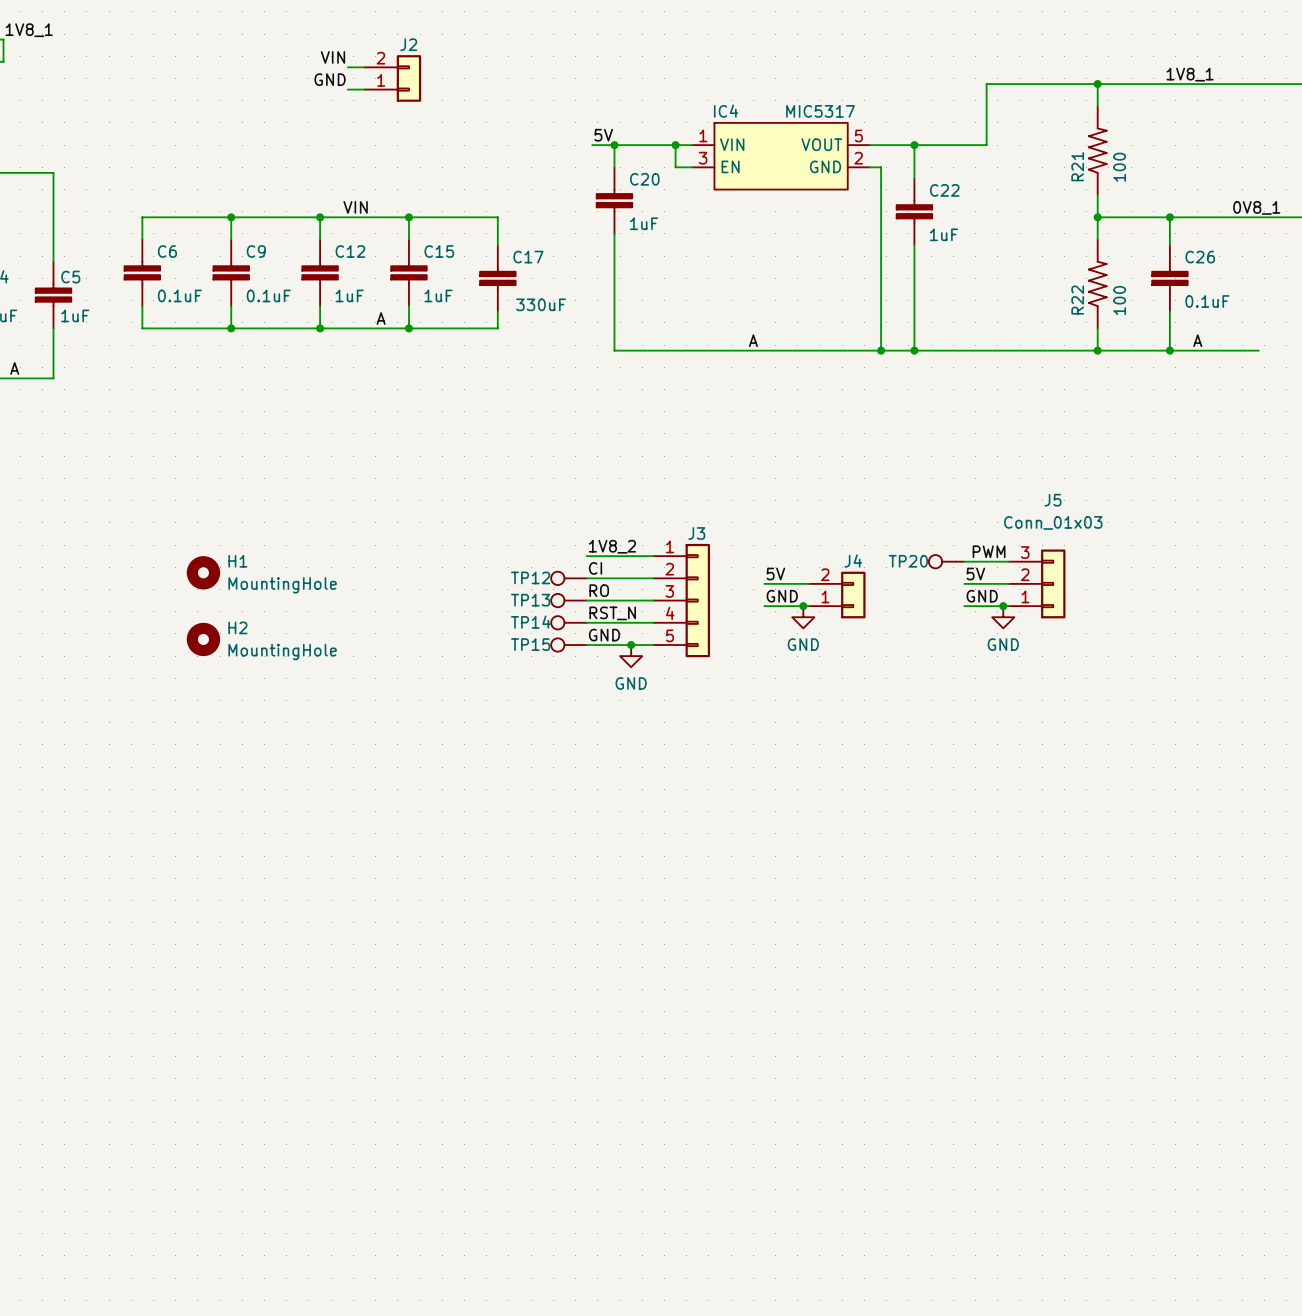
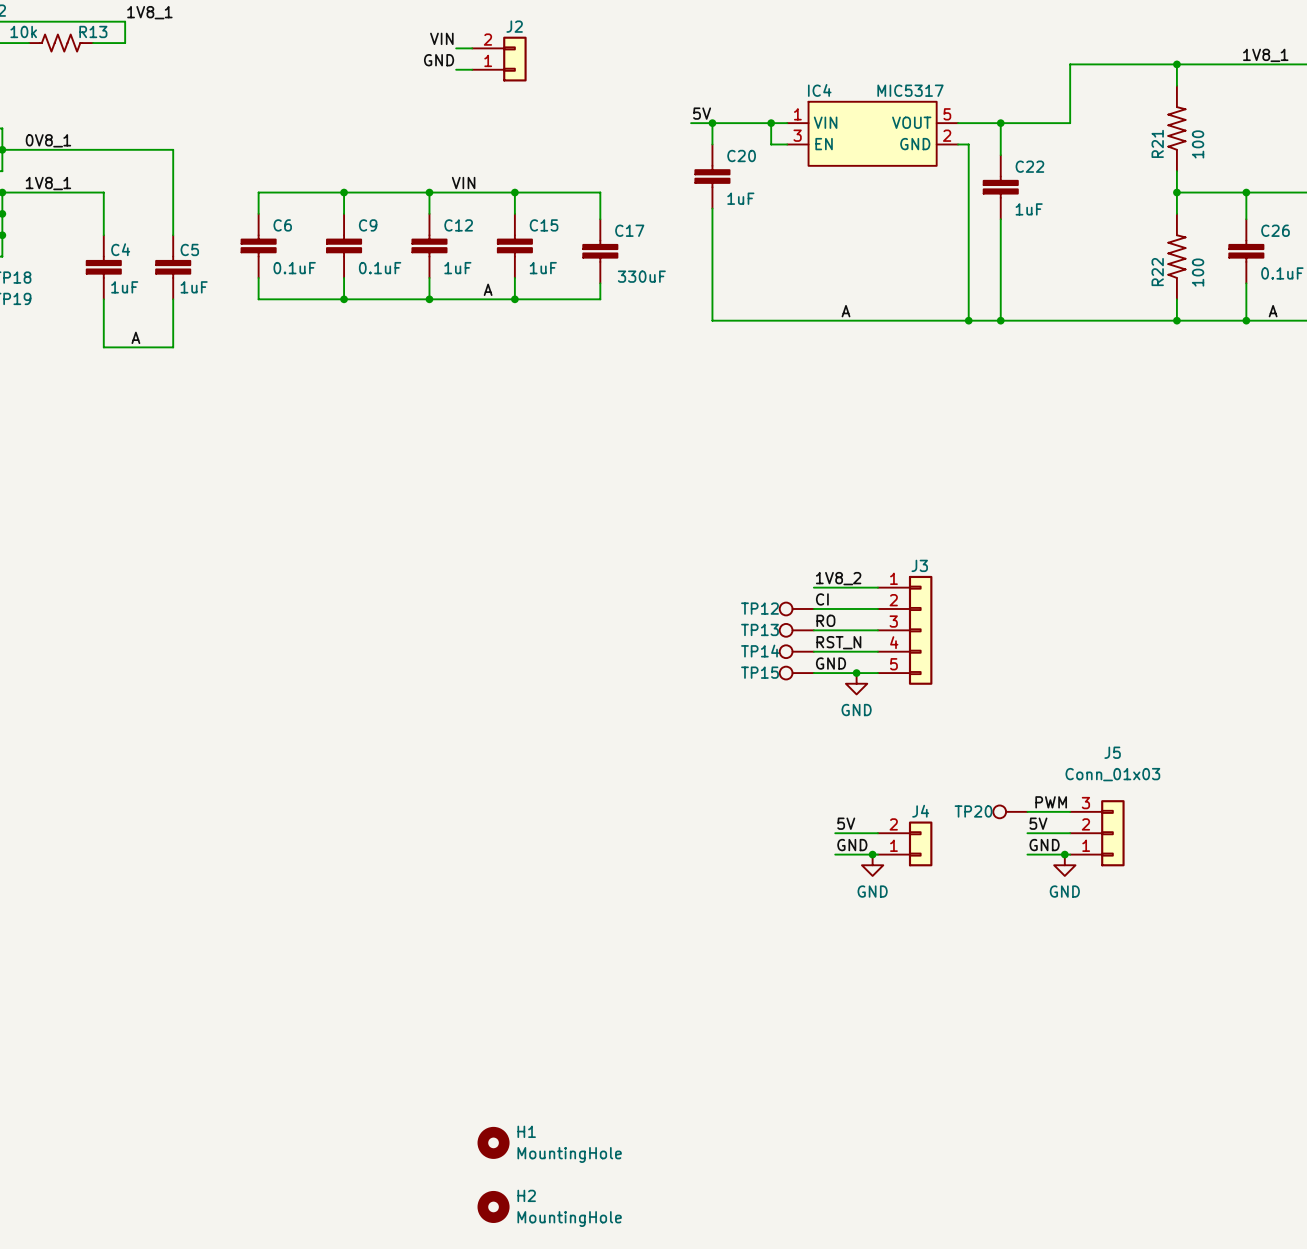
label position: 1V8_2 (612, 546) -> 1V8_2 (838, 578)
label: PWM (989, 551) -> none
wire: (586, 556) (653, 556) -> (813, 587) (877, 587)
TP20 position: (946, 561) -> (1010, 811)
wire: (964, 561) (1008, 561) -> none
label position: CI (595, 568) -> CI (822, 599)
H1 position: (203, 572) -> (493, 1142)
label: 5V (775, 573) -> none
label: 5V (975, 573) -> none
TP12 position: (568, 578) -> (796, 608)
wire: (586, 578) (653, 578) -> (813, 608) (877, 608)
wire: (764, 583) (808, 583) -> none
wire: (964, 583) (1008, 583) -> none
J5 position: (1037, 583) -> (1097, 833)
label position: RO (599, 590) -> RO (825, 620)
J4 position: (837, 595) -> (905, 843)
label: GND (782, 596) -> none
label: GND (982, 596) -> none
TP13 position: (568, 600) -> (796, 630)
wire: (586, 600) (653, 600) -> (813, 630) (877, 630)
J3 position: (681, 600) -> (905, 630)
wire: (764, 606) (808, 606) -> none
junction: (803, 606) -> none
wire: (964, 606) (1008, 606) -> none
junction: (1003, 606) -> none
label position: RST_N (612, 613) -> RST_N (838, 642)
power symbol: GND (803, 617) -> none
power symbol: GND (1003, 617) -> none
TP14 position: (568, 622) -> (796, 651)
wire: (586, 622) (653, 622) -> (813, 651) (877, 651)
label: GND (604, 635) -> none
H2 position: (203, 639) -> (493, 1206)
TP15 position: (568, 645) -> (796, 673)
wire: (586, 645) (653, 645) -> (813, 673) (877, 673)
junction: (631, 645) -> none
power symbol: GND (631, 656) -> none
label: none -> GND (831, 663)
junction: none -> (856, 673)
power symbol: none -> GND (856, 683)
label: none -> PWM (1051, 802)
wire: none -> (1027, 811) (1070, 811)
label: none -> 5V (846, 823)
label: none -> 5V (1038, 823)
wire: none -> (835, 833) (877, 833)
wire: none -> (1027, 833) (1070, 833)
label: none -> GND (852, 845)
label: none -> GND (1044, 845)
wire: none -> (835, 854) (877, 854)
junction: none -> (872, 854)
wire: none -> (1027, 854) (1070, 854)
junction: none -> (1064, 854)
power symbol: none -> GND (872, 865)
power symbol: none -> GND (1064, 865)

